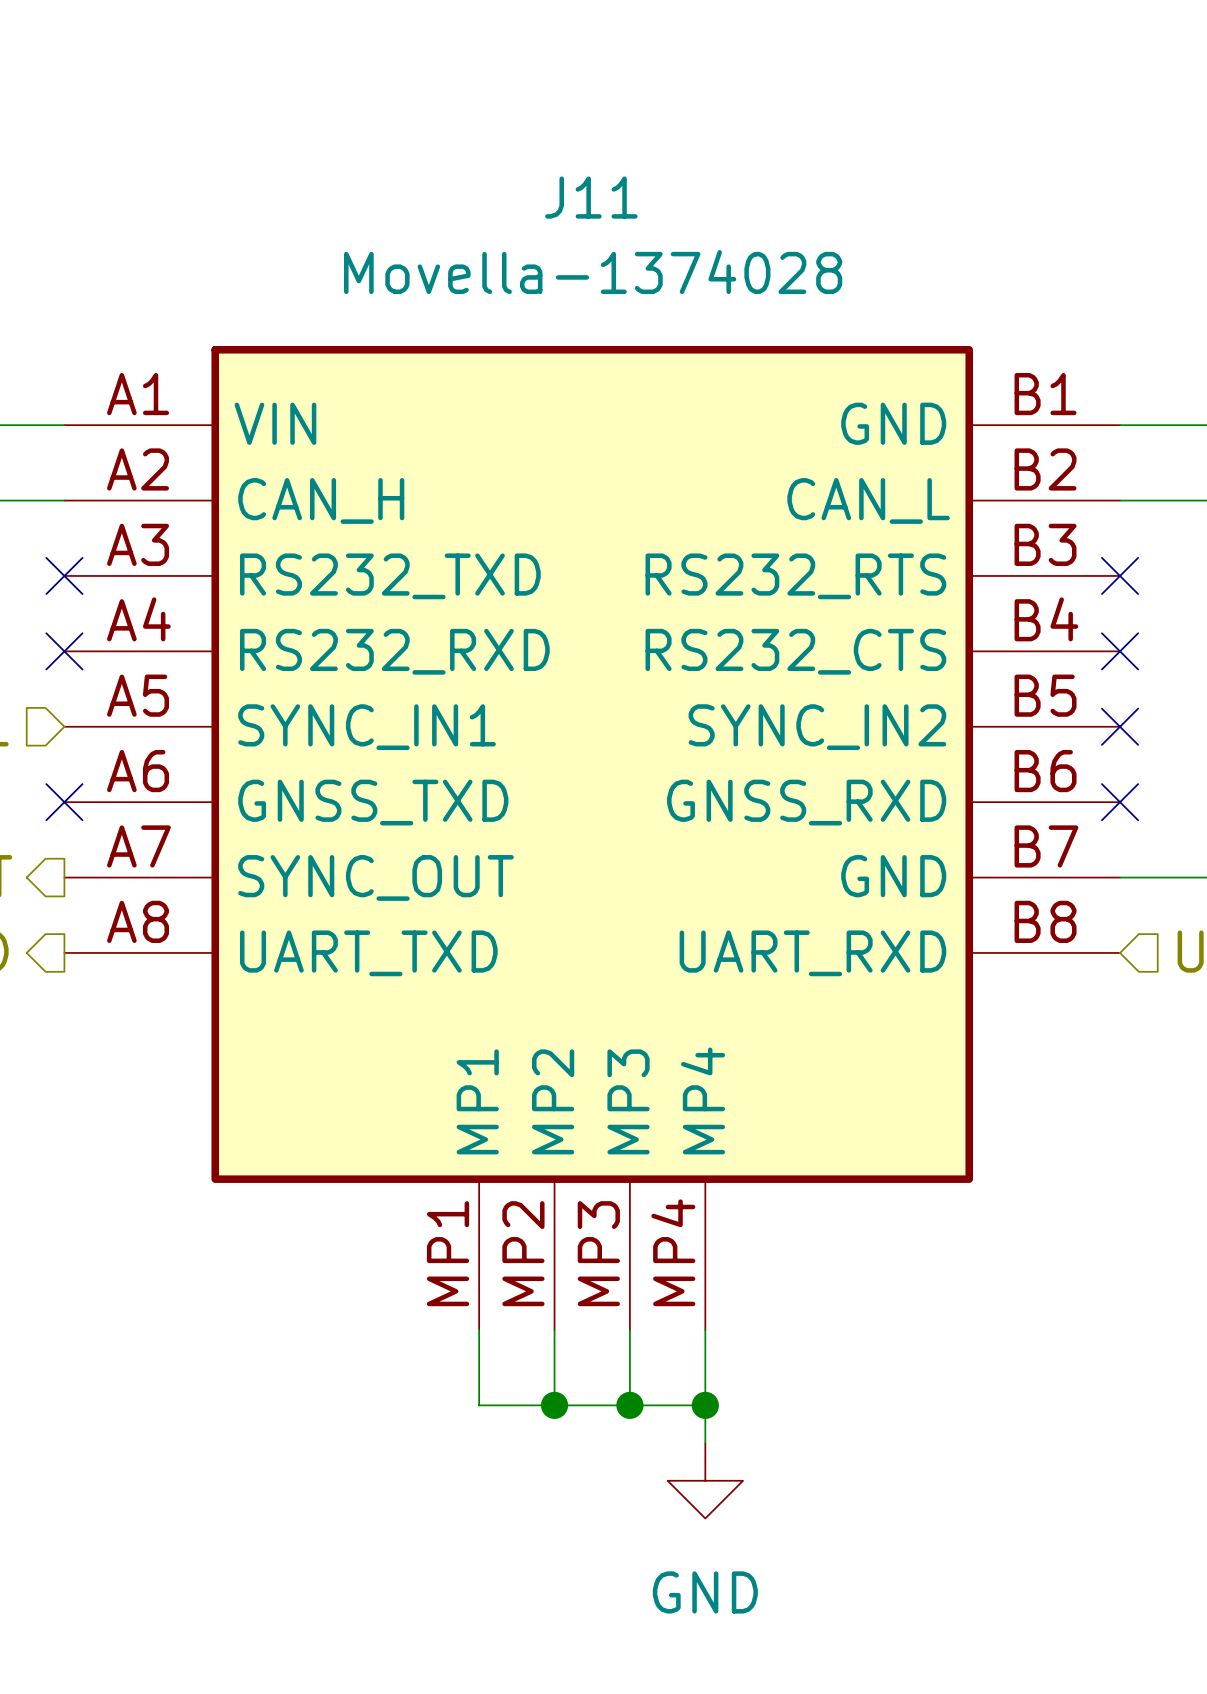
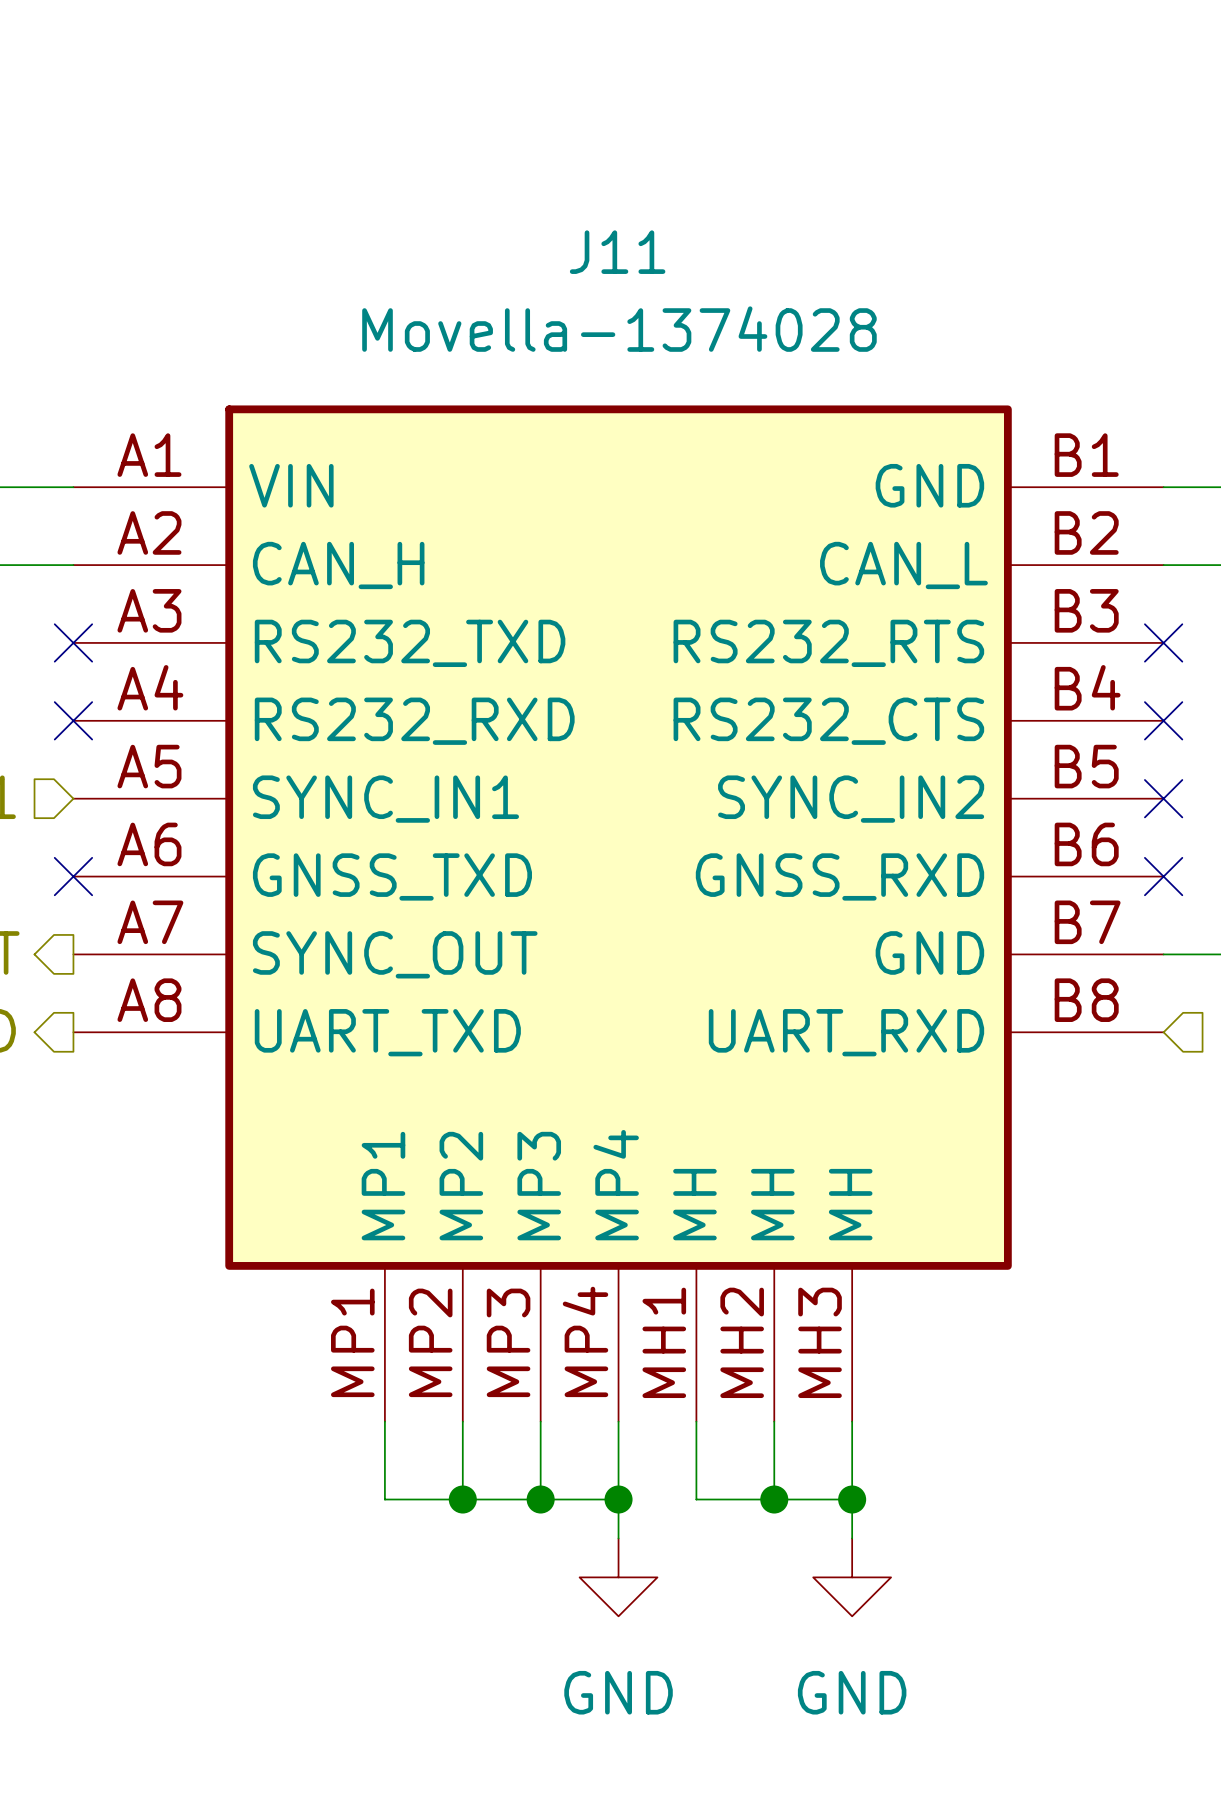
J11 symbol: [64, 345, 1121, 1330] -> [73, 405, 1164, 1422]
wire: (479, 1329) (479, 1405) -> (384, 1421) (384, 1499) (501, 1499)
wire: none -> (540, 1421) (540, 1499)
wire: (554, 1329) (554, 1405) -> (462, 1421) (462, 1499)
wire: (629, 1329) (629, 1405) -> (774, 1421) (774, 1499)
wire: (705, 1329) (705, 1443) -> (618, 1421) (618, 1538)
wire: none -> (852, 1421) (852, 1538)
junction: none -> (462, 1499)
junction: none -> (540, 1499)
junction: (554, 1405) -> none
wire: (592, 1405) (667, 1405) -> (696, 1421) (696, 1499)
junction: none -> (618, 1499)
junction: (629, 1405) -> none
wire: none -> (735, 1499) (852, 1499)
junction position: (705, 1405) -> (774, 1499)
junction: none -> (852, 1499)
power symbol: none -> GND (618, 1577)
power symbol: GND (705, 1480) -> none
power symbol: none -> GND (852, 1577)

